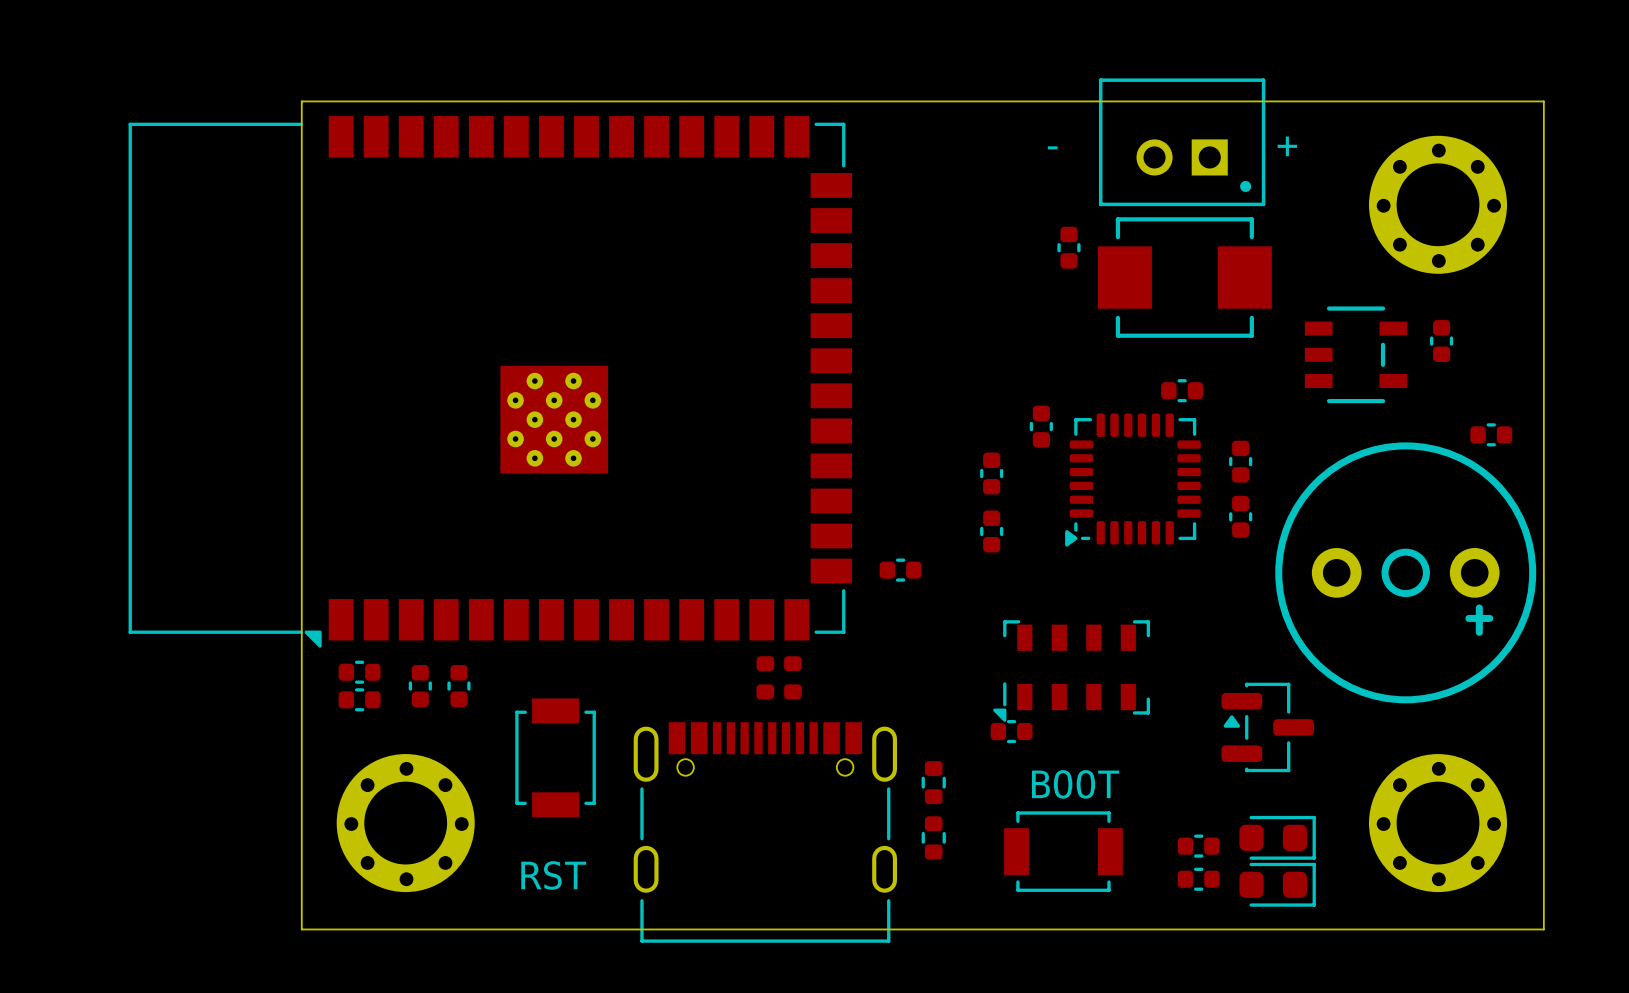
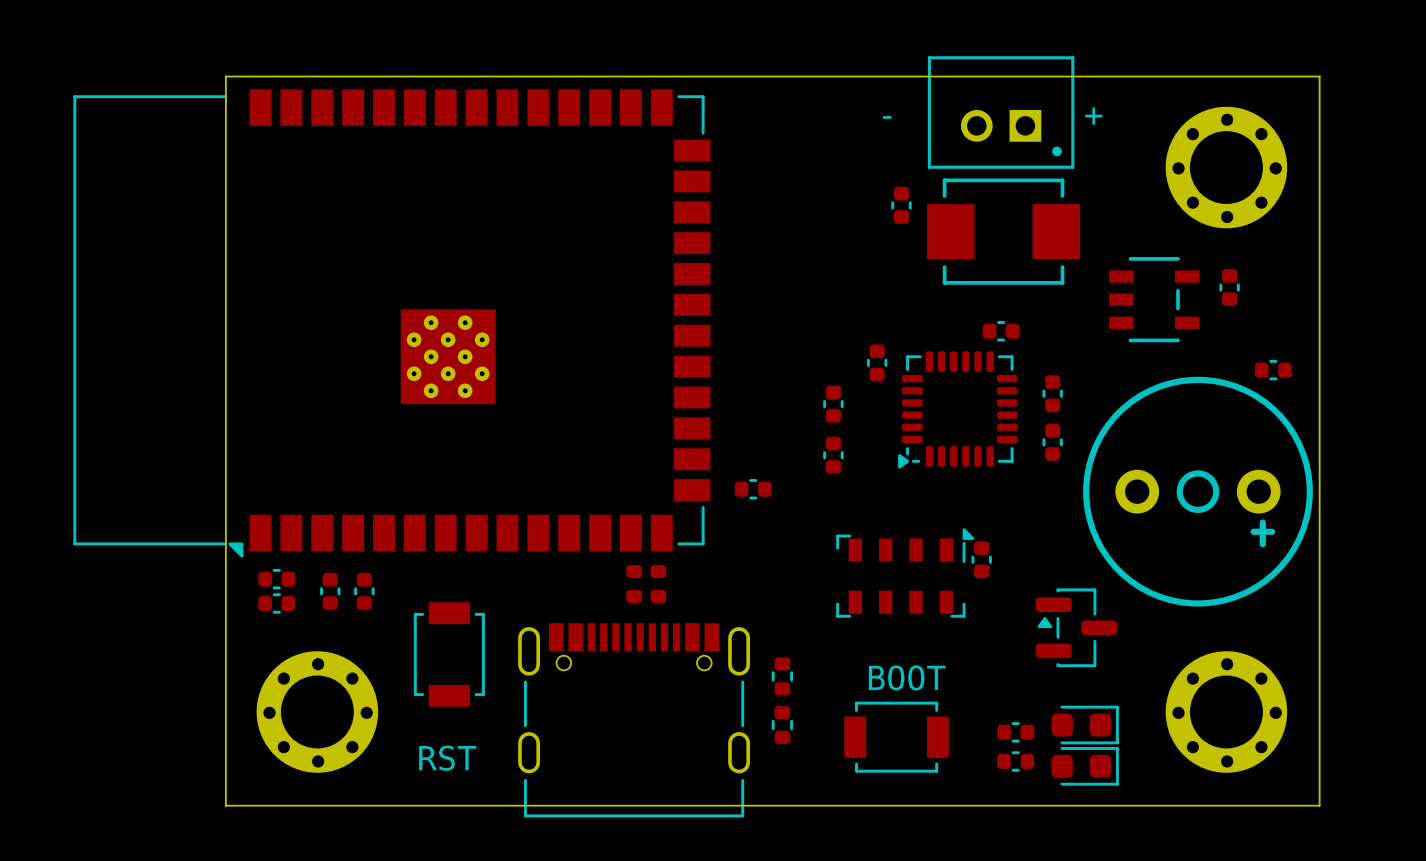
part rotation: 0° (1071, 670) -> 180° (905, 572)
part rotation: 0° (1011, 731) -> 90° clockwise (981, 559)
part position: (1011, 731) -> (981, 559)

